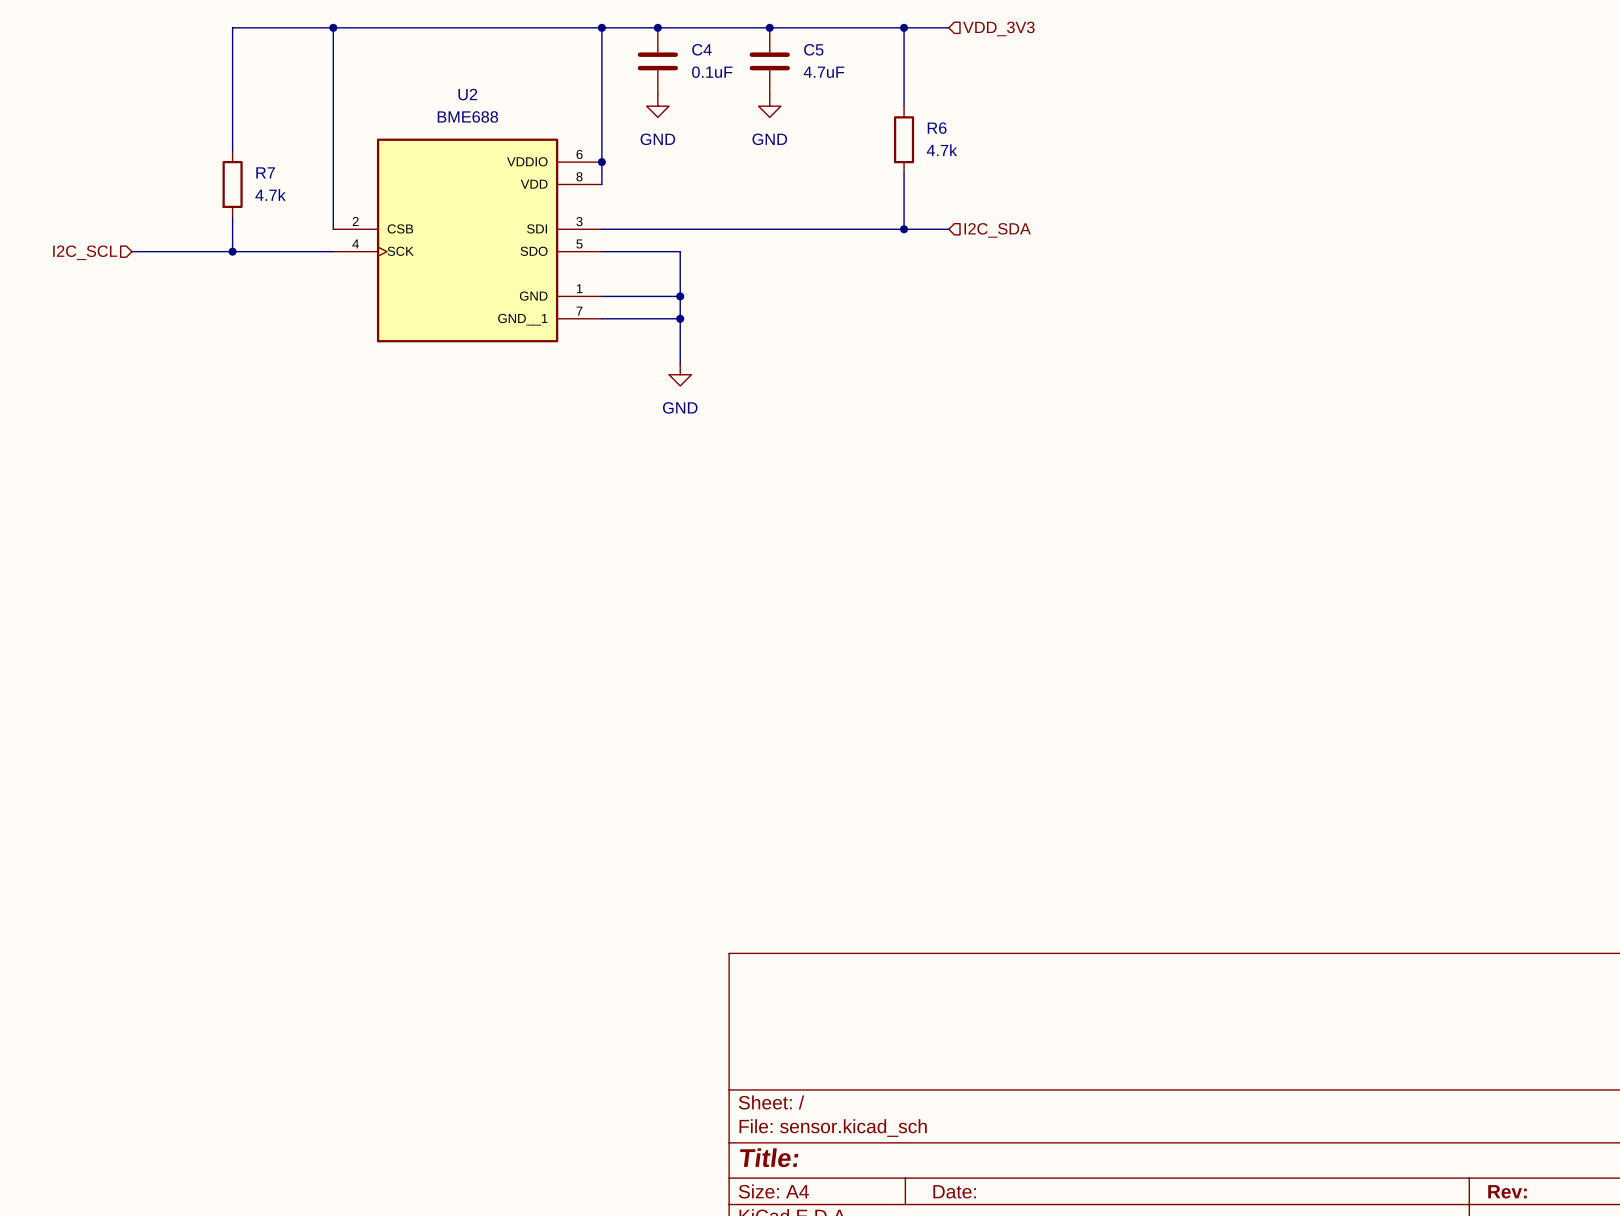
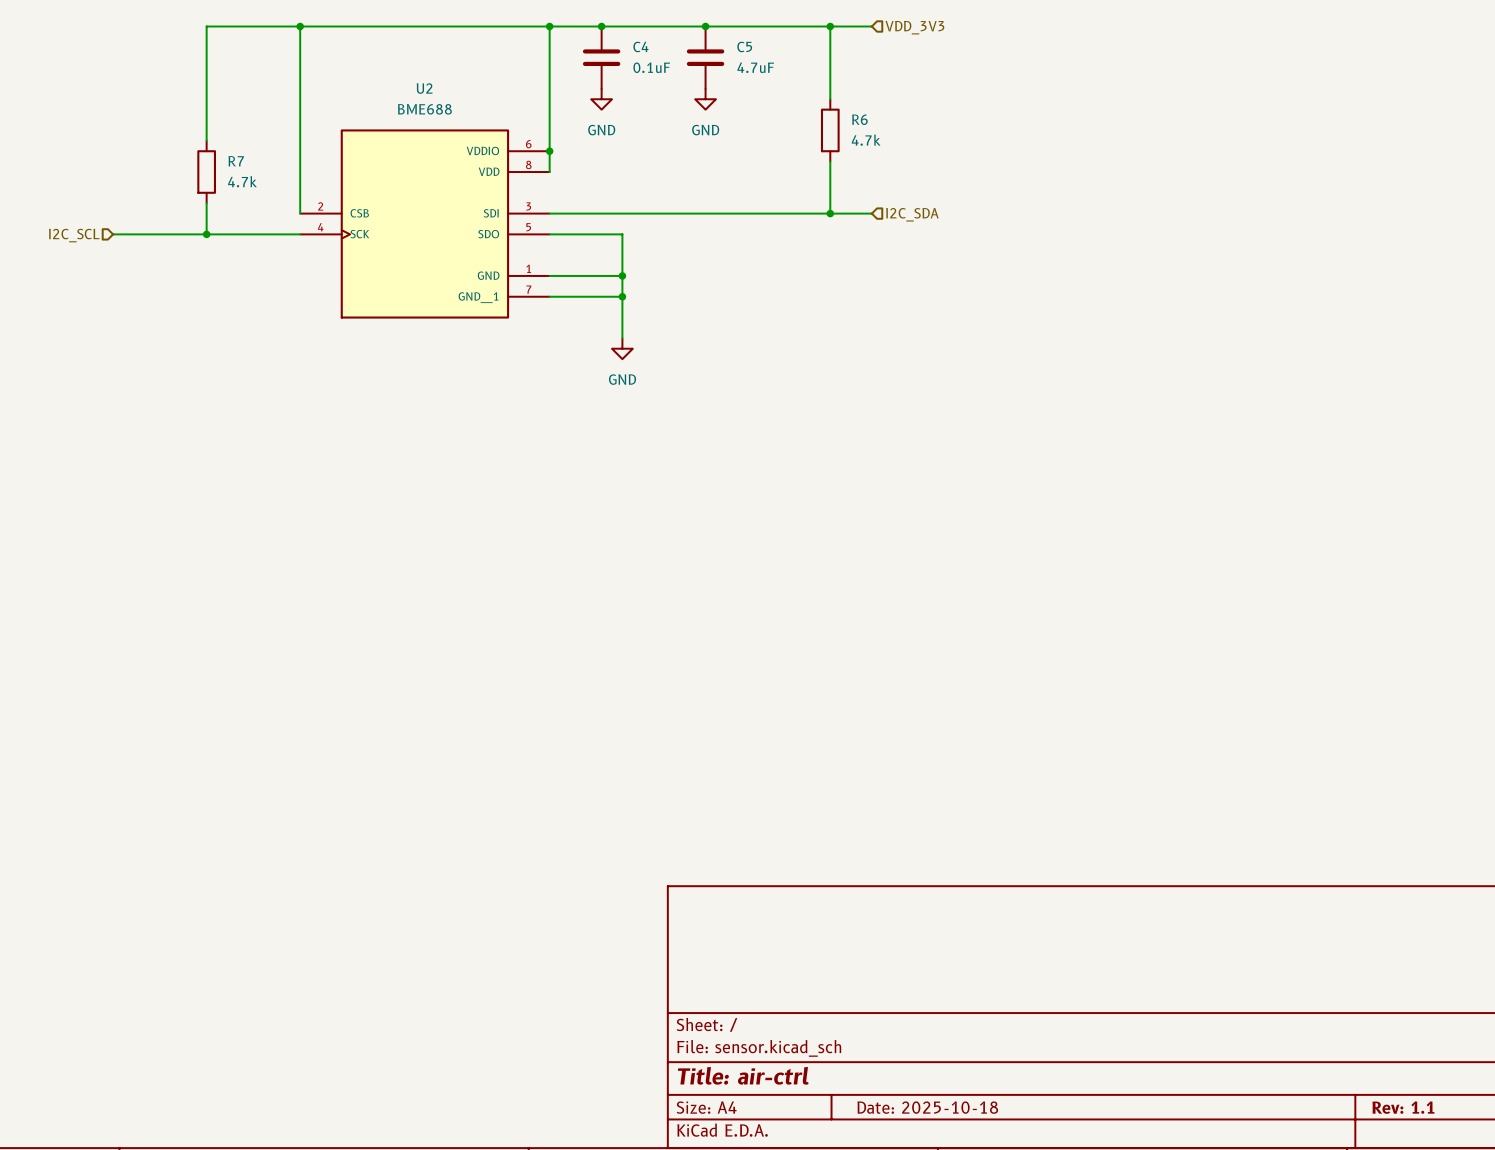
title block: Title: (769, 1157) -> Title: air-ctrl (743, 1075)
title block: Date: (954, 1191) -> Date: 2025-10-18 (927, 1107)
title block: Rev: (1507, 1191) -> Rev: 1.1 (1403, 1107)

